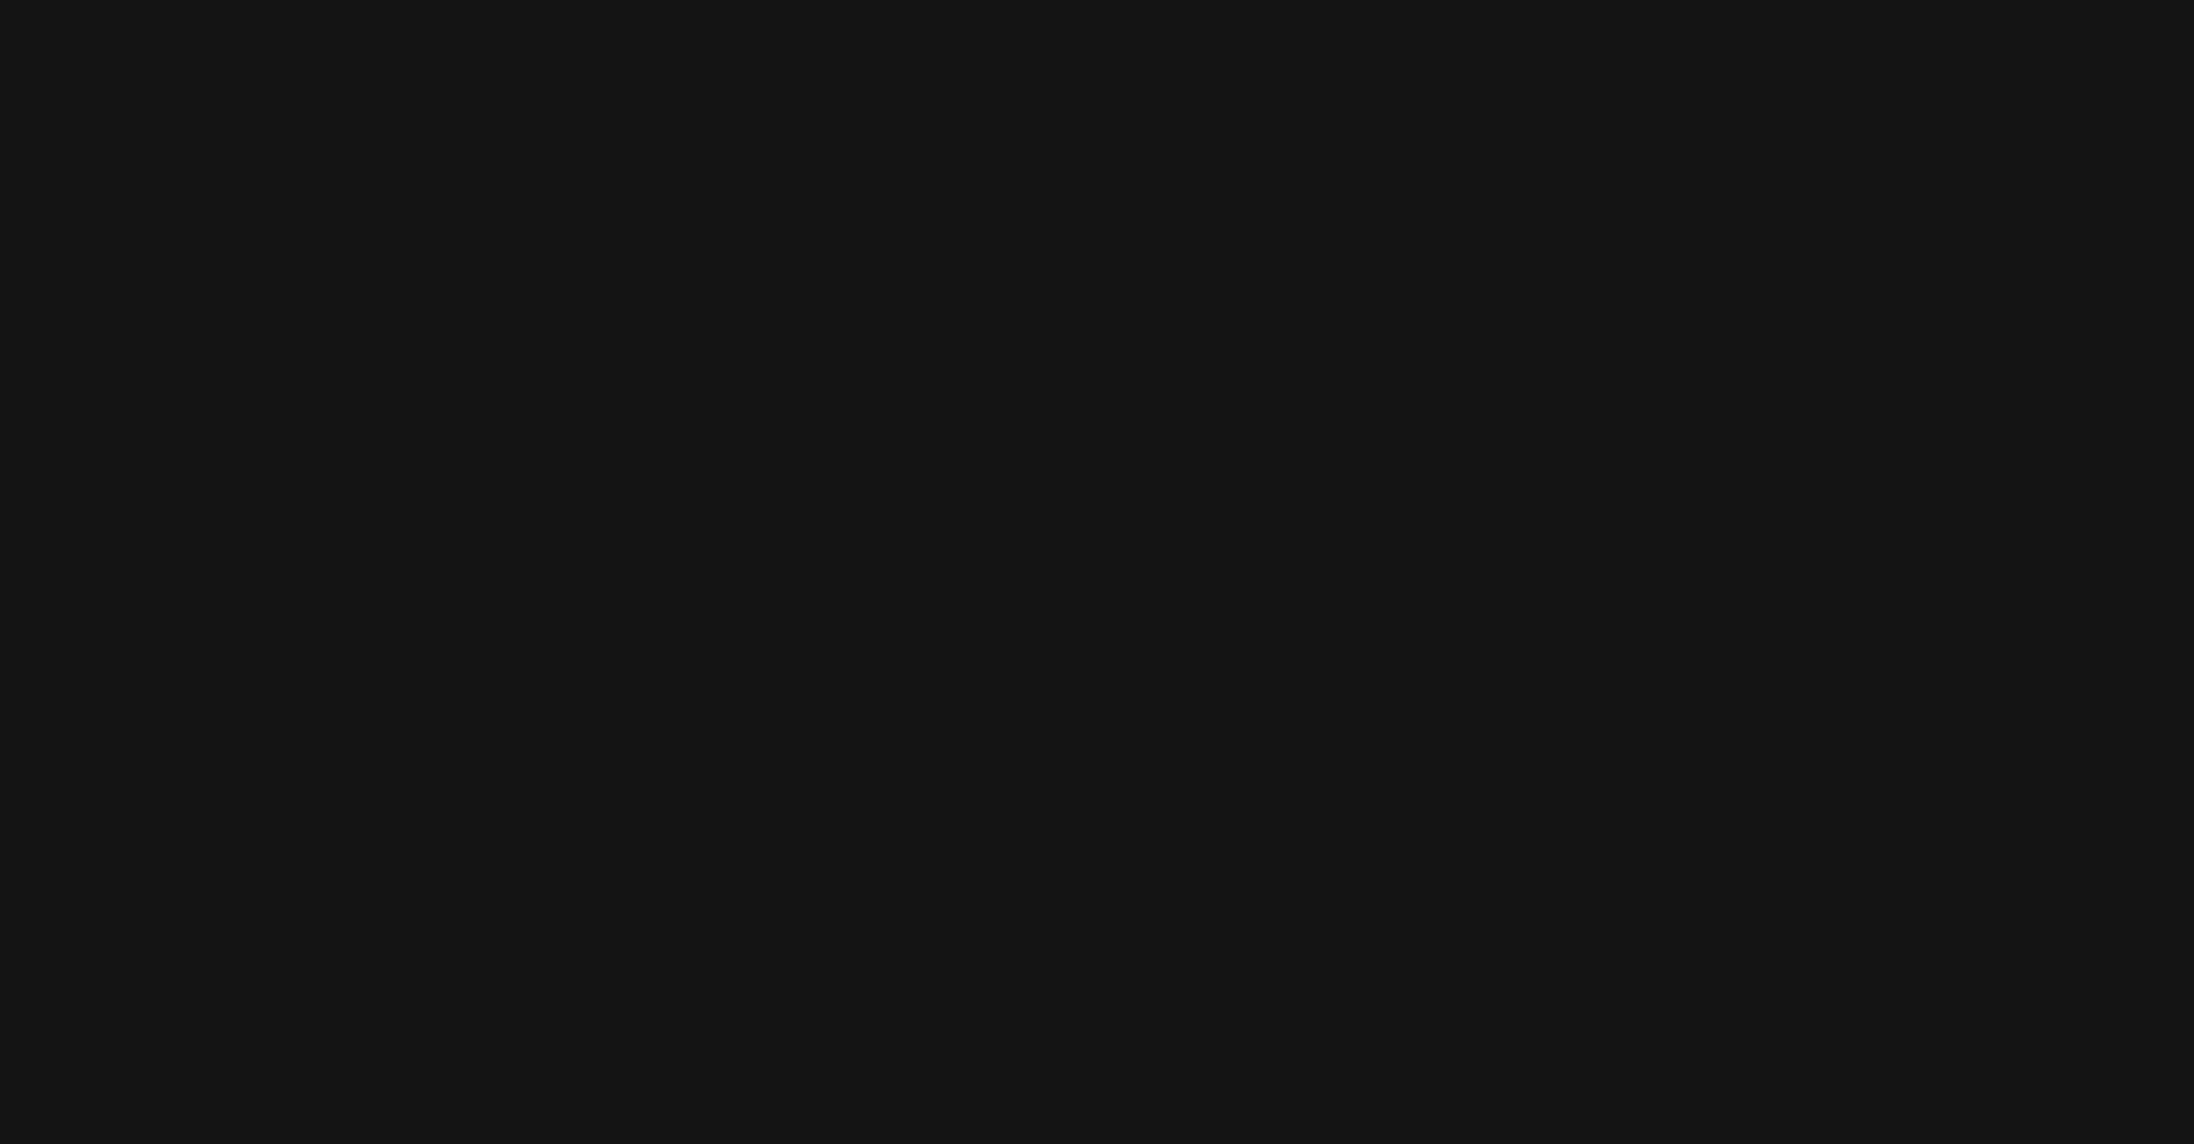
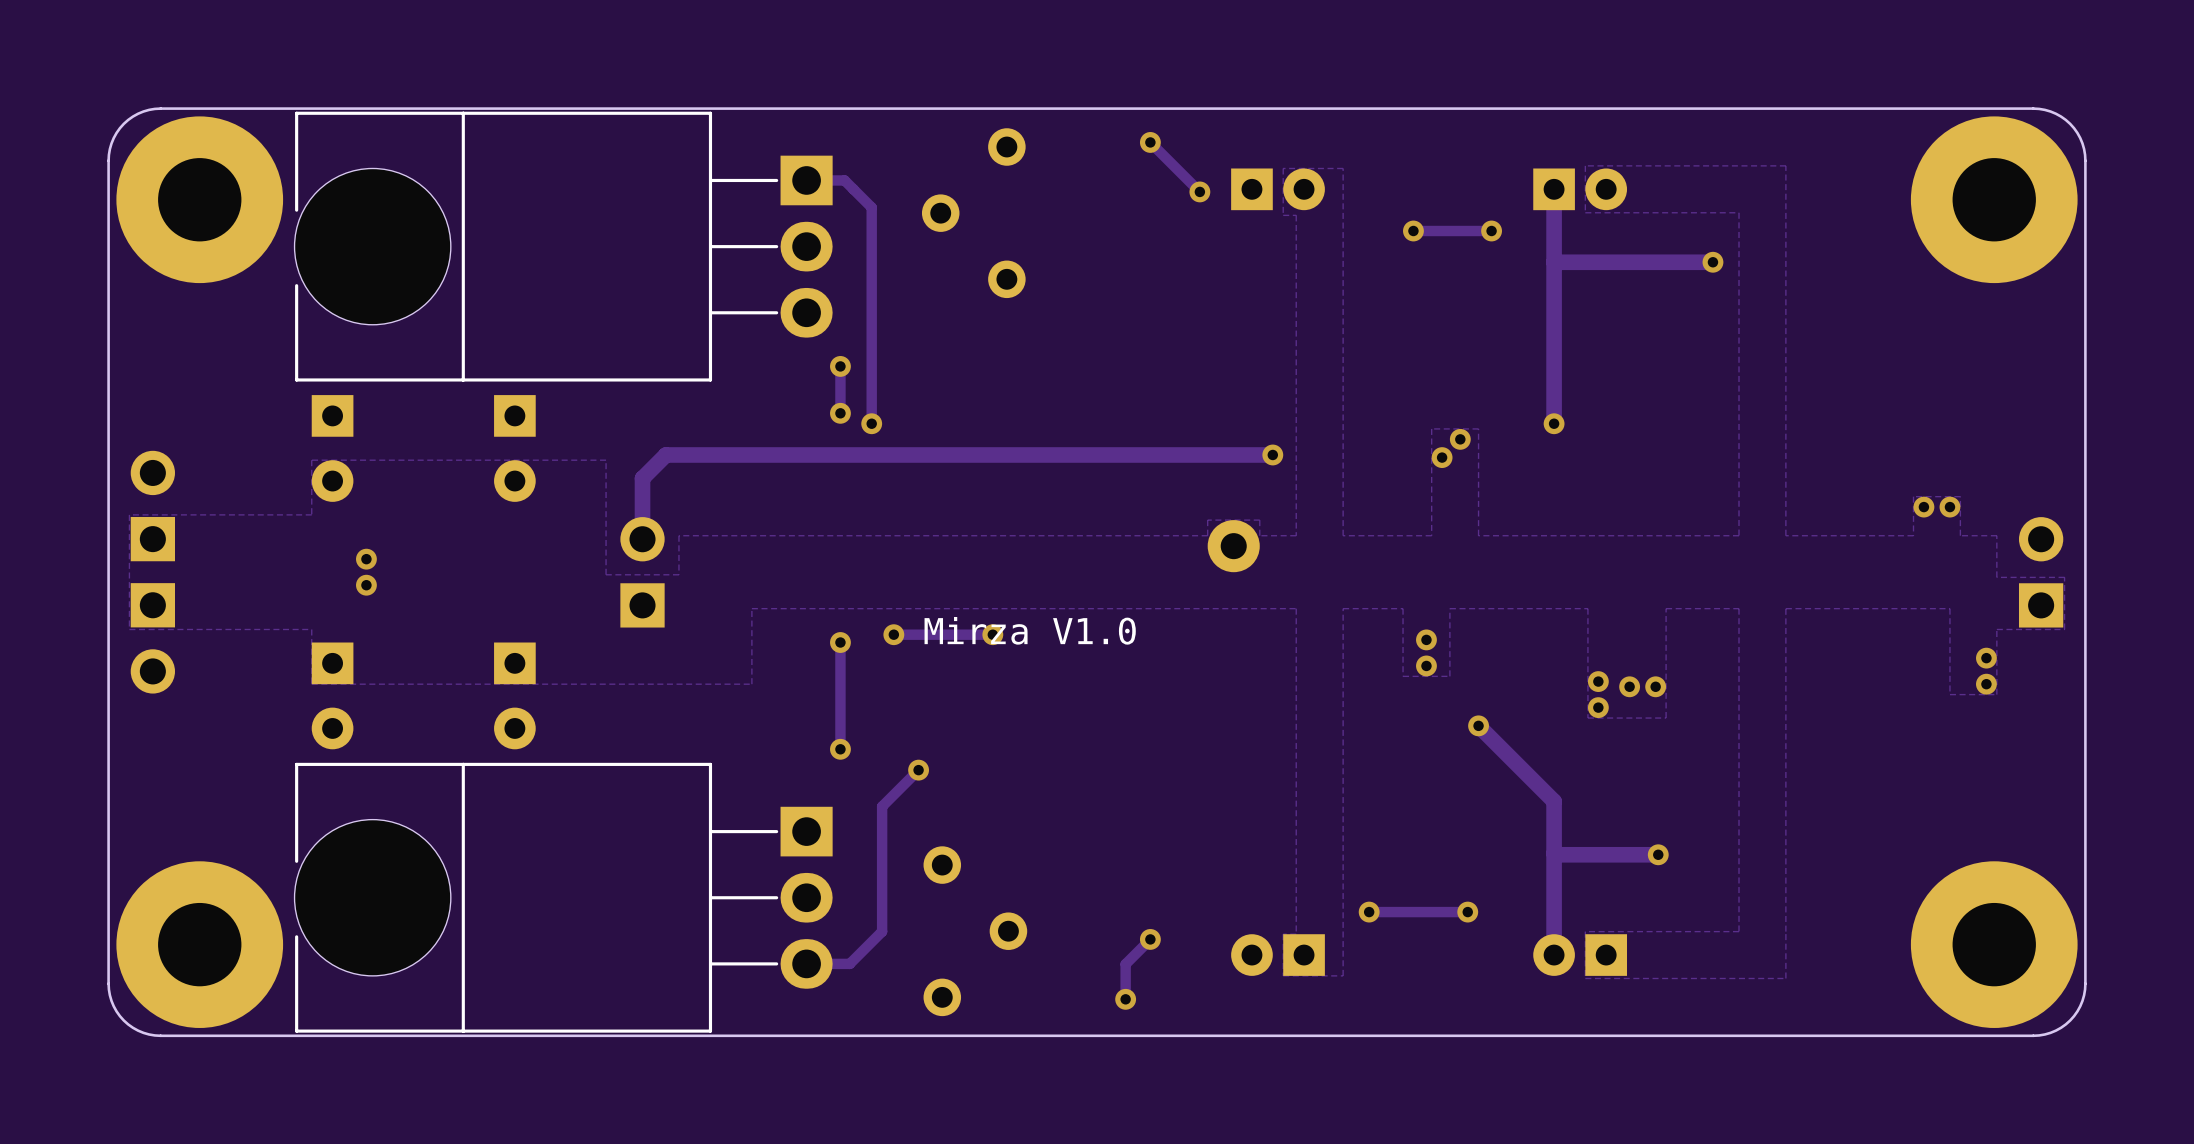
board edge: none -> (2033, 108) (160, 108) (138, 113) (123, 123) (116, 132) (109, 149) (108, 160) (108, 983) (113, 1006) (123, 1020) (132, 1027) (143, 1032) (160, 1035) (2033, 1035) (2055, 1030) (2065, 1024) (2077, 1011) (2082, 1000) (2085, 983) (2085, 160) (2082, 143) (2070, 123) (2055, 113) (2033, 108)
track: none -> (1150, 142) (1199, 191)
via: none -> (1150, 142)
zone outline: none -> (1785, 165) (1785, 535) (1913, 535) (1913, 496) (1960, 496) (1960, 535) (1996, 535) (1996, 577) (2064, 577) (2064, 629) (1996, 629) (1996, 694) (1949, 694) (1949, 608) (1785, 608) (1785, 978) (1585, 978) (1585, 931) (1739, 931) (1739, 608) (1666, 608) (1666, 718) (1587, 718) (1587, 608) (1449, 608) (1449, 676) (1403, 676) (1403, 608) (1343, 608) (1343, 975) (1283, 975) (1283, 934) (1296, 934) (1296, 608) (751, 608) (751, 684) (311, 684) (311, 629) (129, 629) (129, 514) (311, 514) (311, 460) (606, 460) (606, 574) (678, 574) (678, 535) (1207, 535) (1207, 520) (1259, 520) (1259, 535) (1296, 535) (1296, 215) (1283, 215) (1283, 168) (1343, 168) (1343, 535) (1431, 535) (1431, 428) (1478, 428) (1478, 535) (1739, 535) (1739, 212) (1585, 212) (1585, 165) (1785, 165)
track: none -> (806, 180) (844, 180) (871, 207) (871, 423)
part: none -> (1278, 189)
track: none -> (1554, 189) (1554, 423)
part: none -> (1580, 189)
via: none -> (1199, 191)
part: none -> (199, 199)
part: none -> (1994, 199)
part: none -> (973, 213)
via: none -> (1413, 231)
track: none -> (1491, 231) (1413, 231)
via: none -> (1491, 231)
part: none -> (563, 246)
track: none -> (1712, 262) (1554, 262)
via: none -> (1712, 262)
track: none -> (840, 366) (840, 413)
via: none -> (840, 366)
via: none -> (840, 413)
via: none -> (871, 423)
via: none -> (1554, 423)
via: none -> (1460, 439)
part: none -> (332, 448)
part: none -> (514, 448)
track: none -> (1272, 454) (665, 454) (642, 478) (642, 539)
via: none -> (1272, 454)
via: none -> (1442, 457)
via: none -> (1923, 507)
via: none -> (1949, 507)
part: none -> (1233, 546)
via: none -> (366, 559)
part: none -> (152, 572)
part: none -> (642, 572)
part: none -> (2041, 572)
via: none -> (366, 585)
text: none -> Mirza V1.0 (1030, 630)
via: none -> (893, 634)
track: none -> (992, 634) (893, 634)
via: none -> (992, 634)
via: none -> (1426, 639)
track: none -> (840, 642) (840, 749)
via: none -> (840, 642)
via: none -> (1986, 658)
via: none -> (1426, 665)
via: none -> (1598, 681)
via: none -> (1986, 684)
via: none -> (1629, 686)
via: none -> (1655, 686)
part: none -> (332, 695)
part: none -> (514, 695)
via: none -> (1598, 707)
track: none -> (1478, 725) (1554, 801) (1554, 955)
via: none -> (1478, 725)
via: none -> (840, 749)
track: none -> (918, 770) (882, 806) (882, 931) (849, 963) (806, 963)
via: none -> (918, 770)
track: none -> (1658, 854) (1555, 854)
via: none -> (1658, 854)
part: none -> (563, 897)
via: none -> (1369, 912)
track: none -> (1467, 912) (1371, 912)
via: none -> (1467, 912)
part: none -> (975, 931)
track: none -> (1150, 939) (1125, 964) (1125, 998)
via: none -> (1150, 939)
part: none -> (199, 944)
part: none -> (1994, 944)
part: none -> (1278, 955)
part: none -> (1580, 955)
via: none -> (1125, 999)

